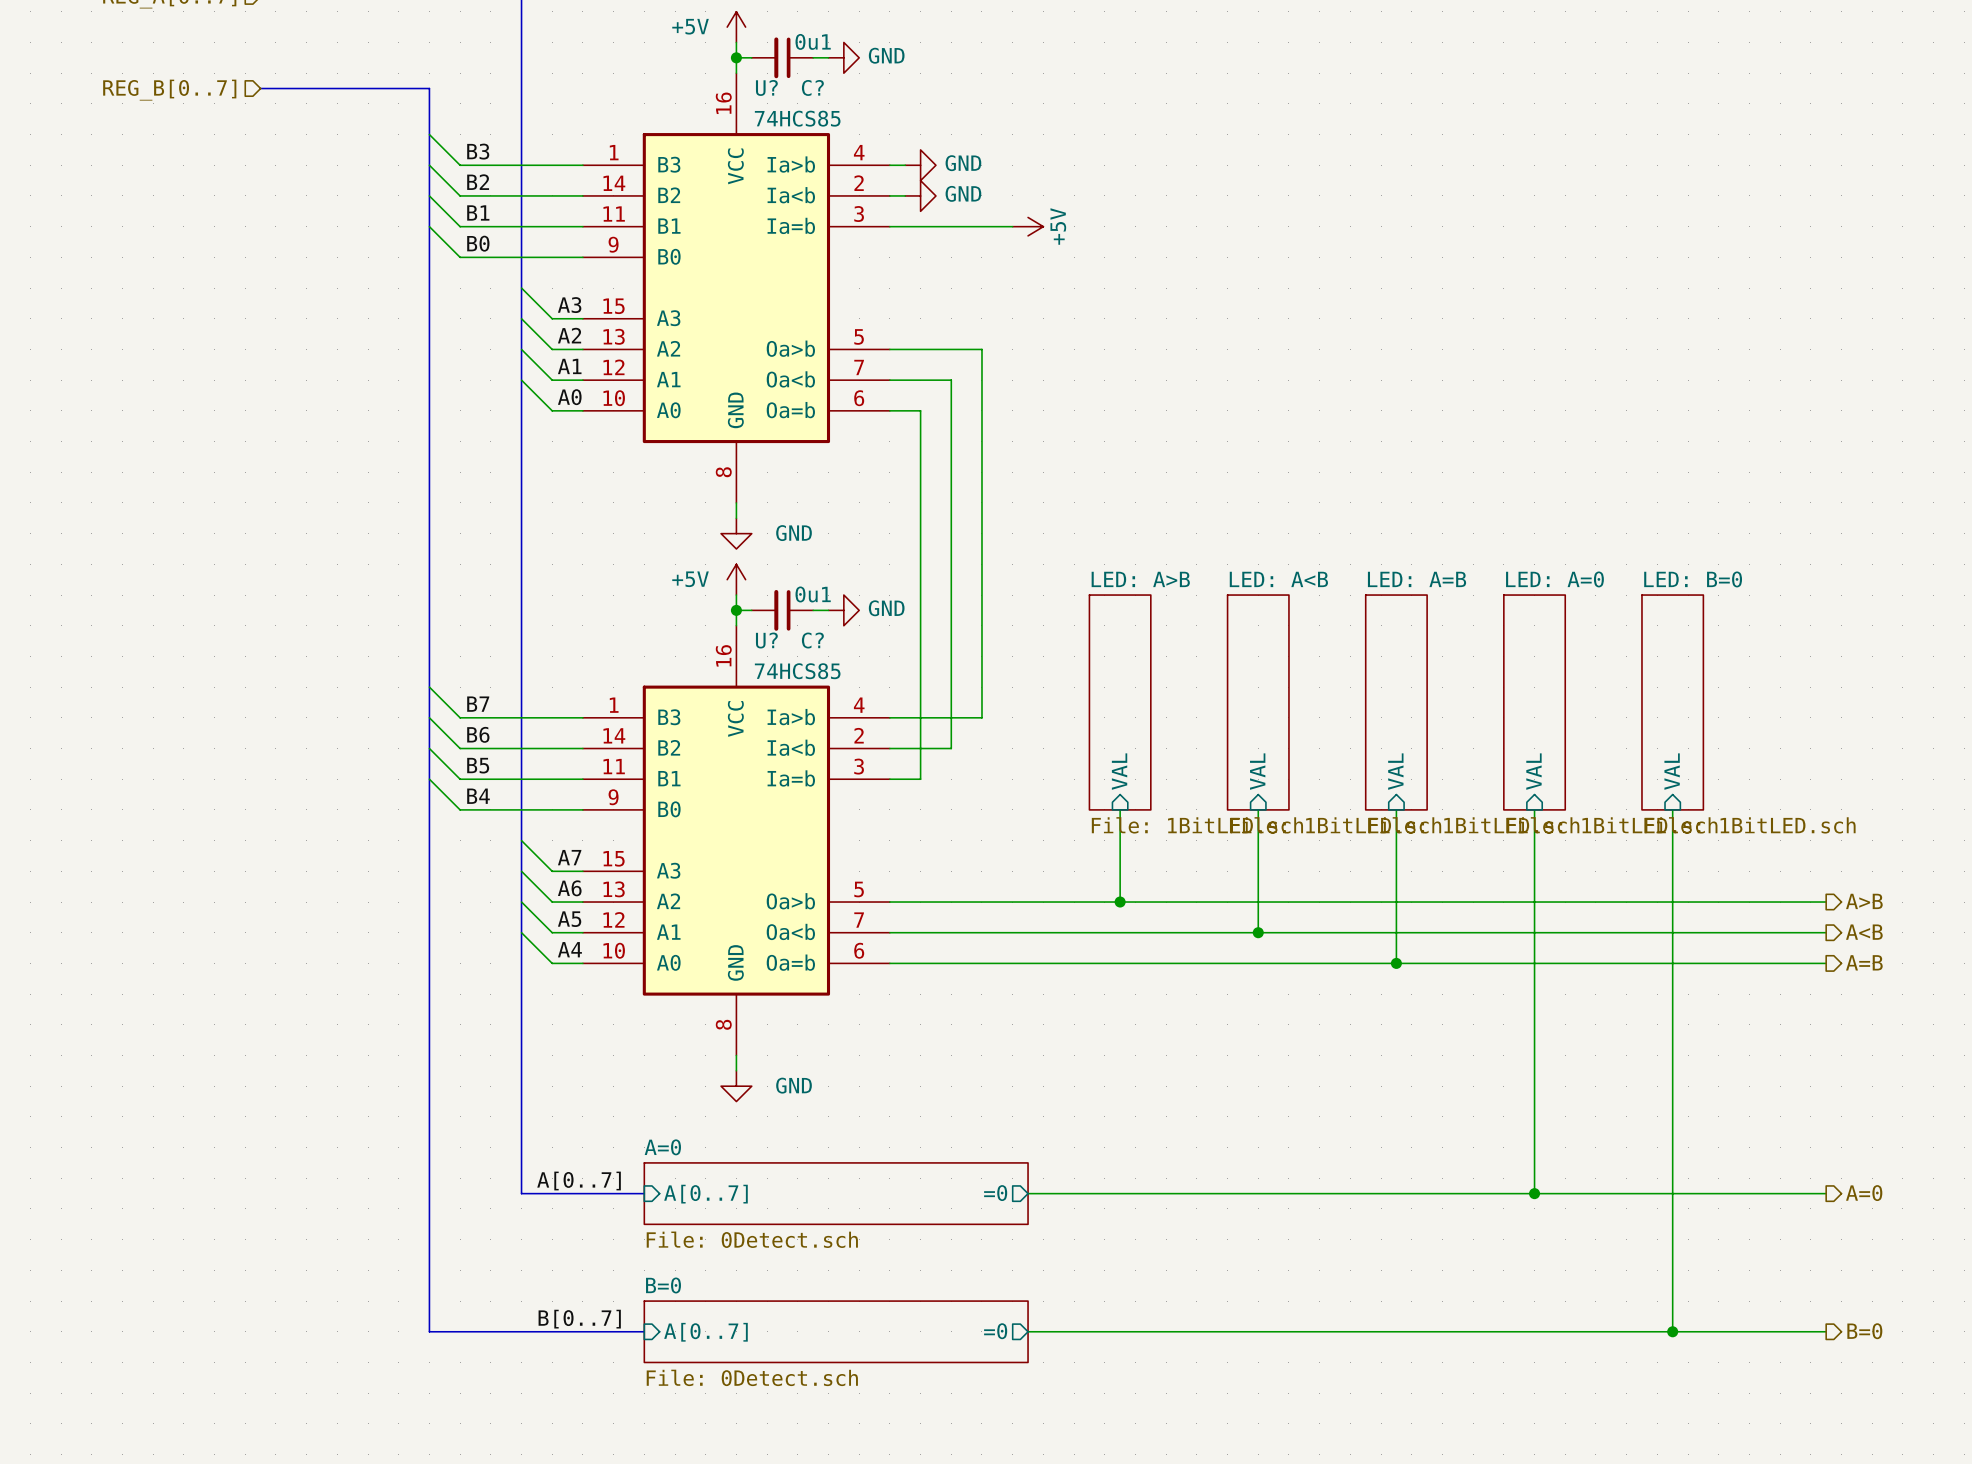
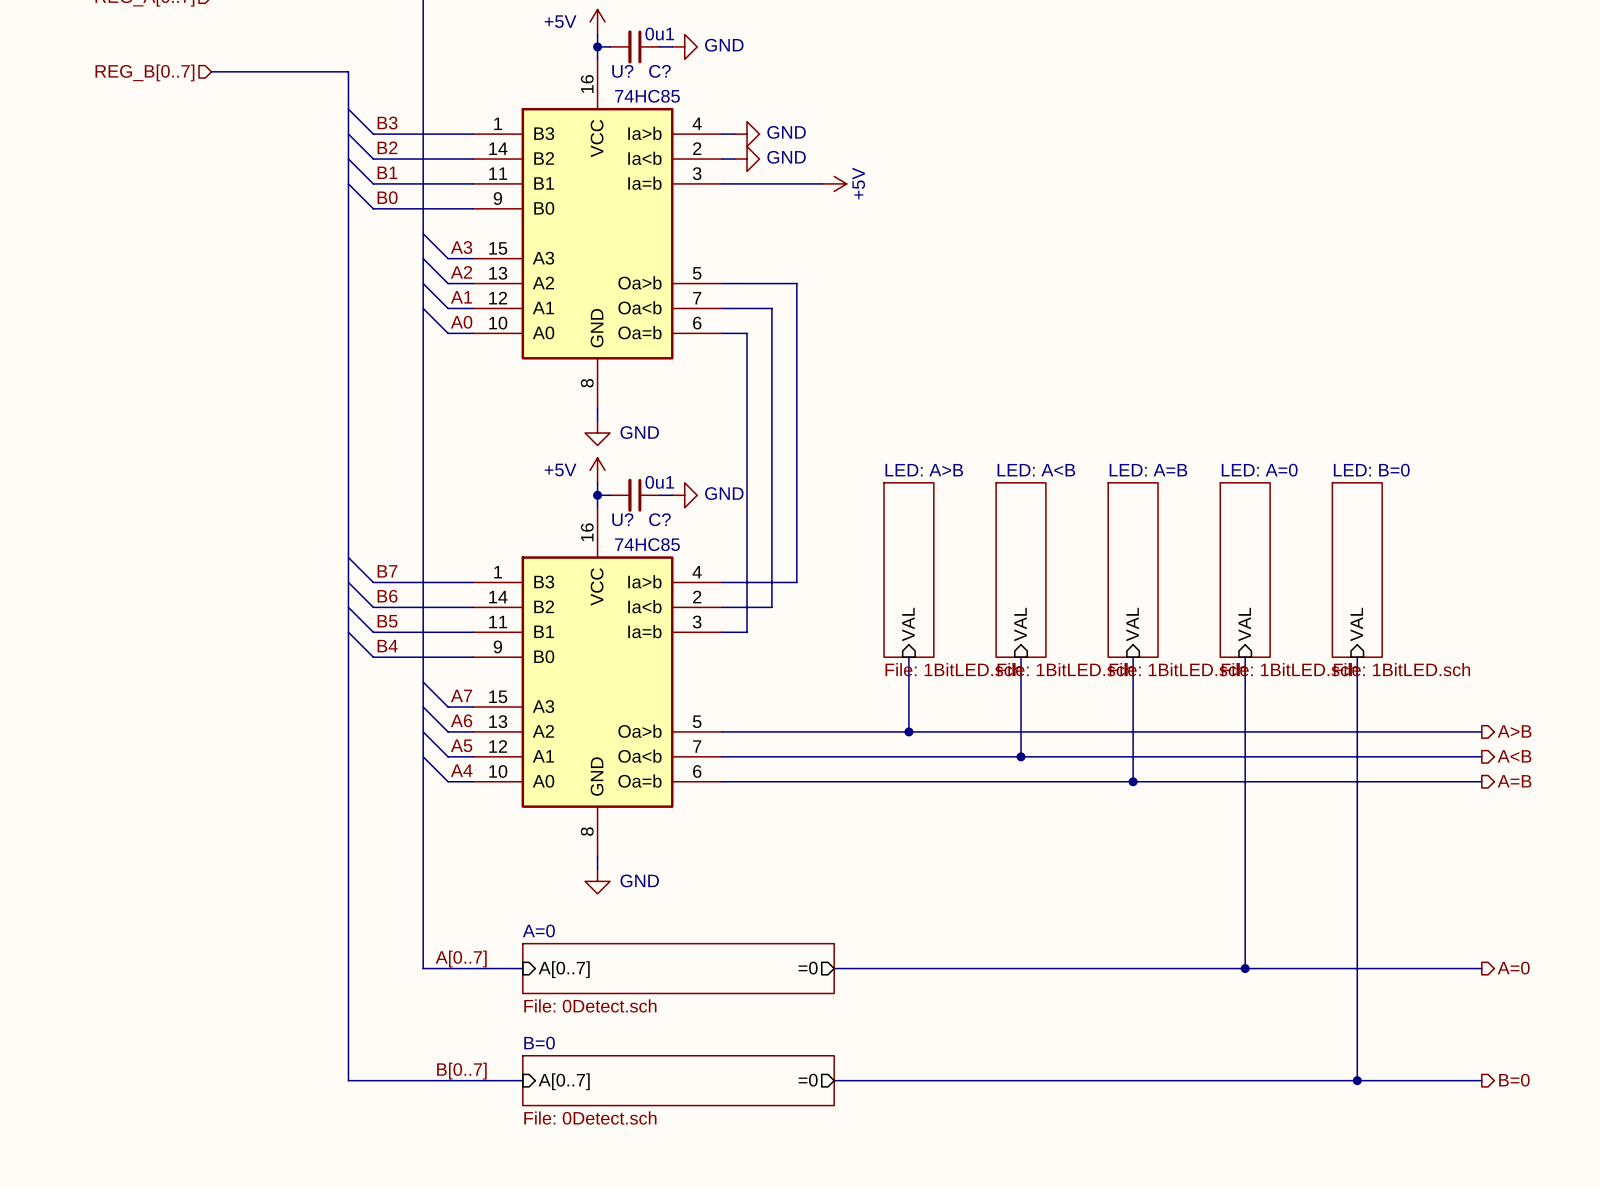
U? value: 74HCS85 (797, 118) -> 74HC85 (647, 96)
U? value: 74HCS85 (797, 671) -> 74HC85 (647, 544)

